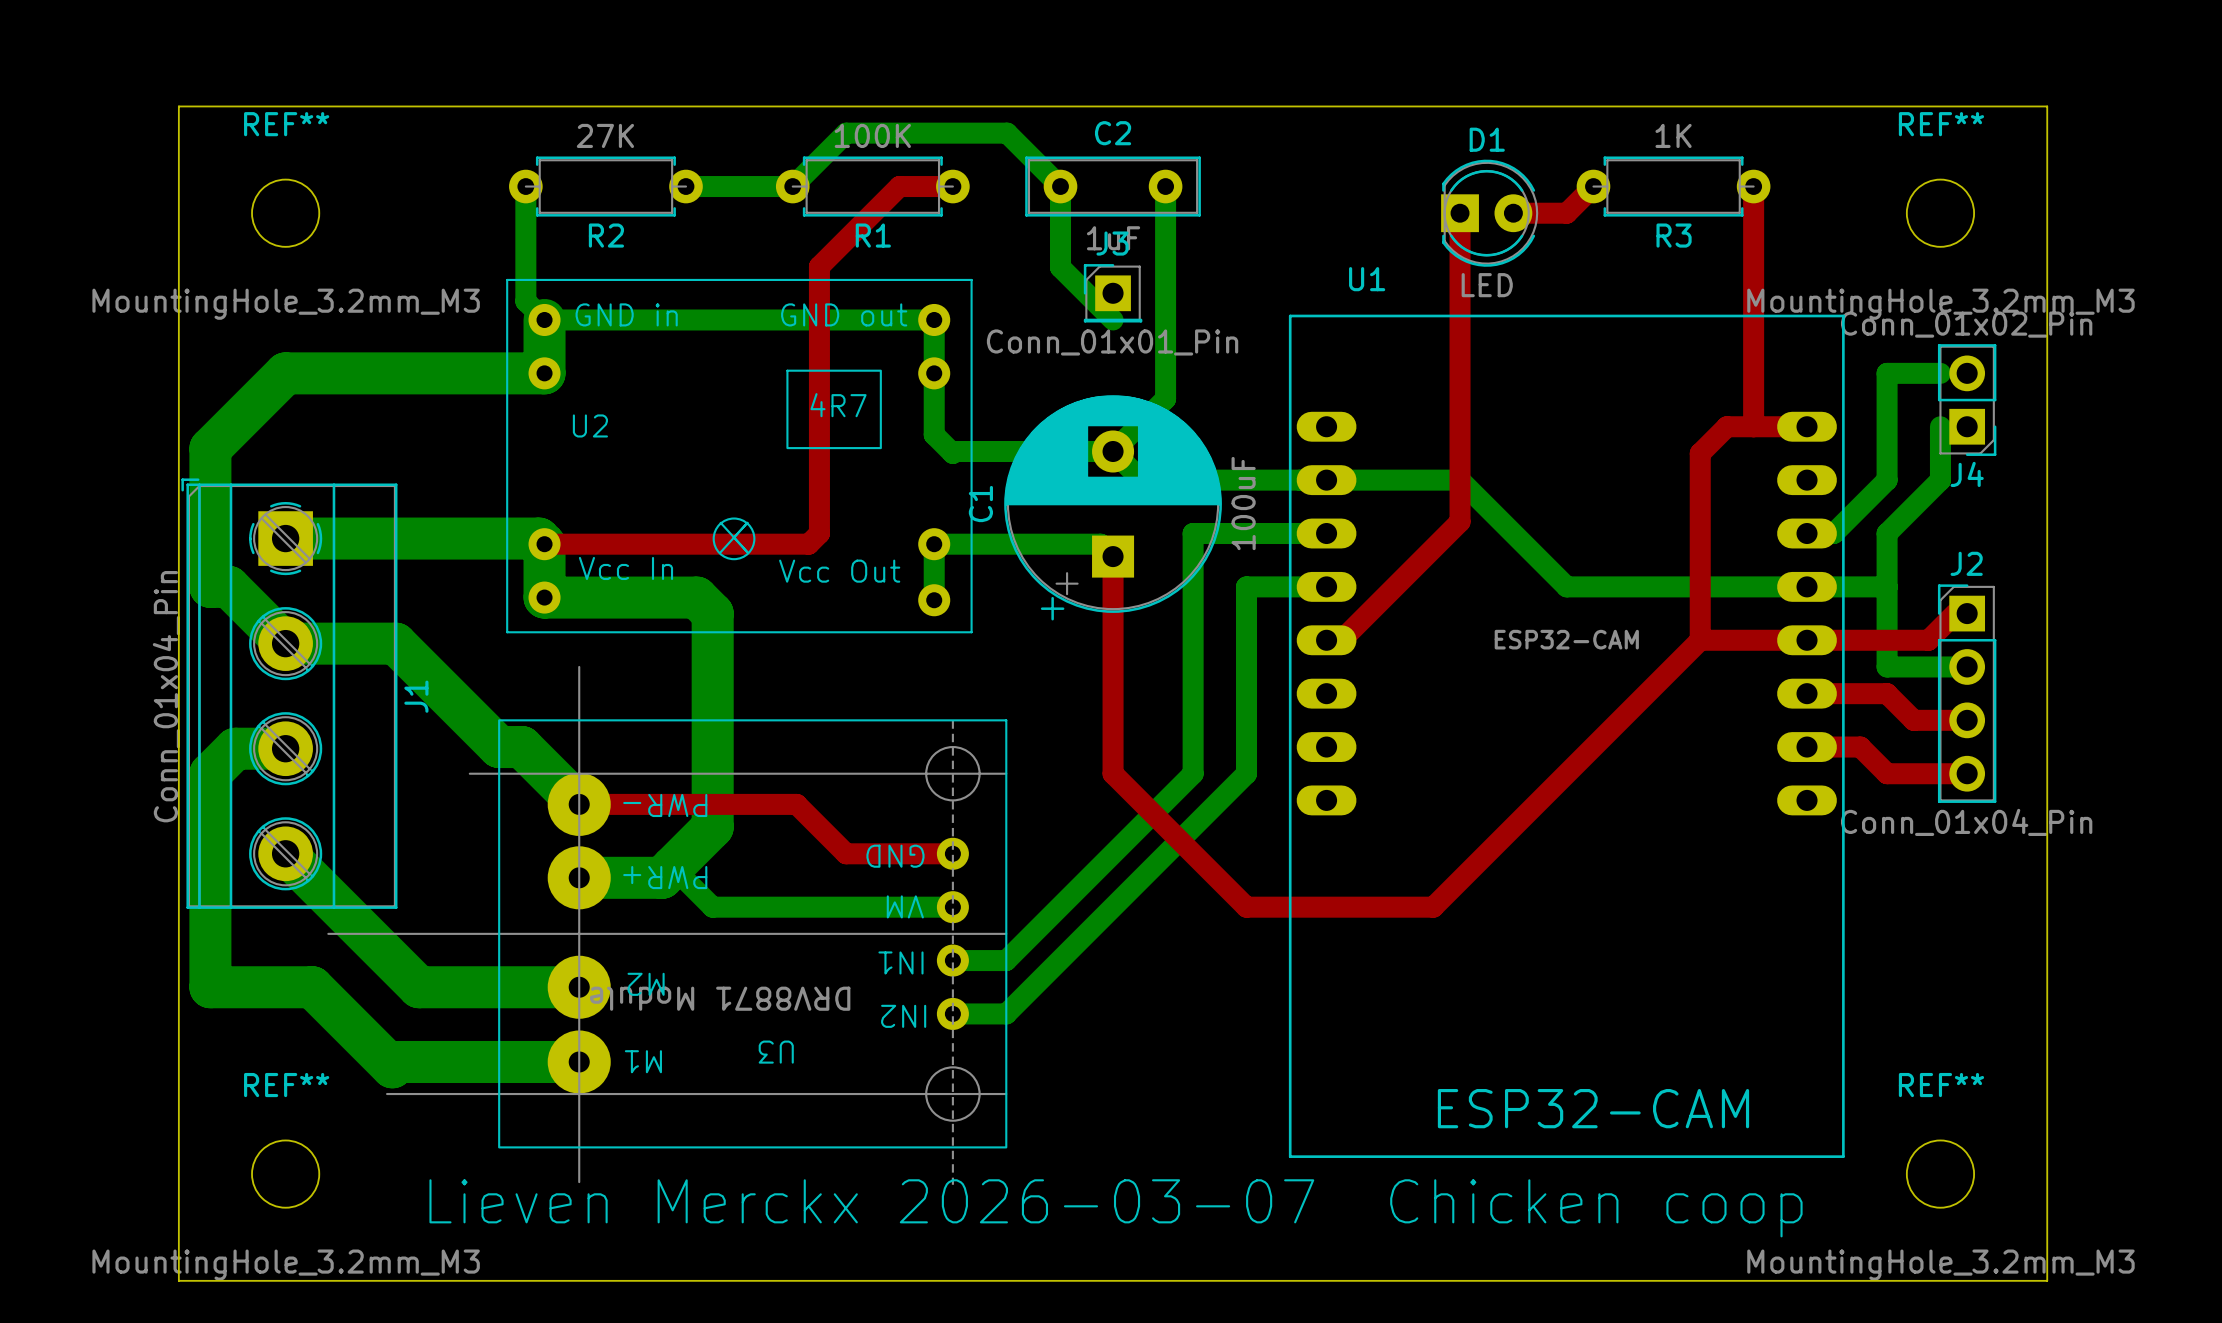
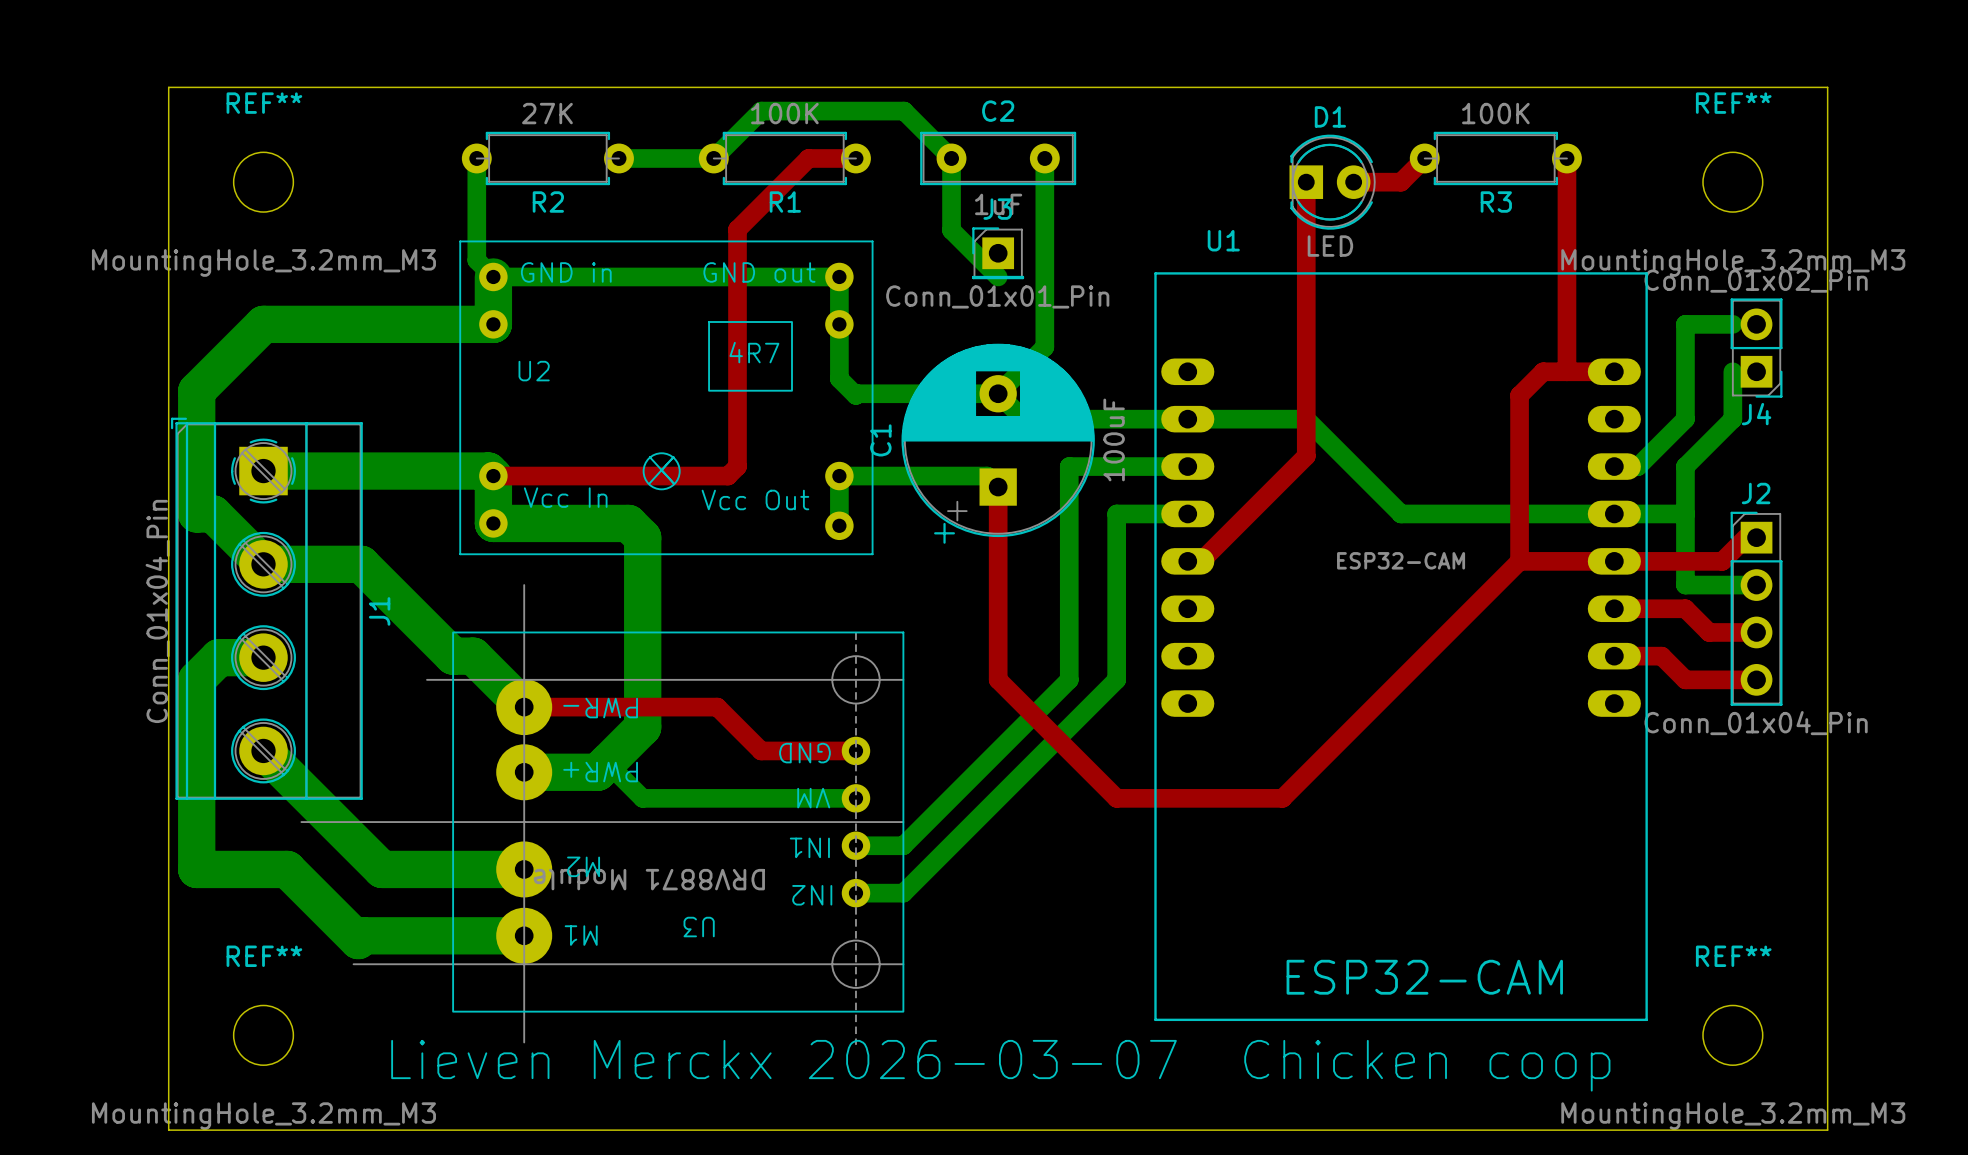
R3 value: 1K (1673, 135) -> 100K (1495, 113)

